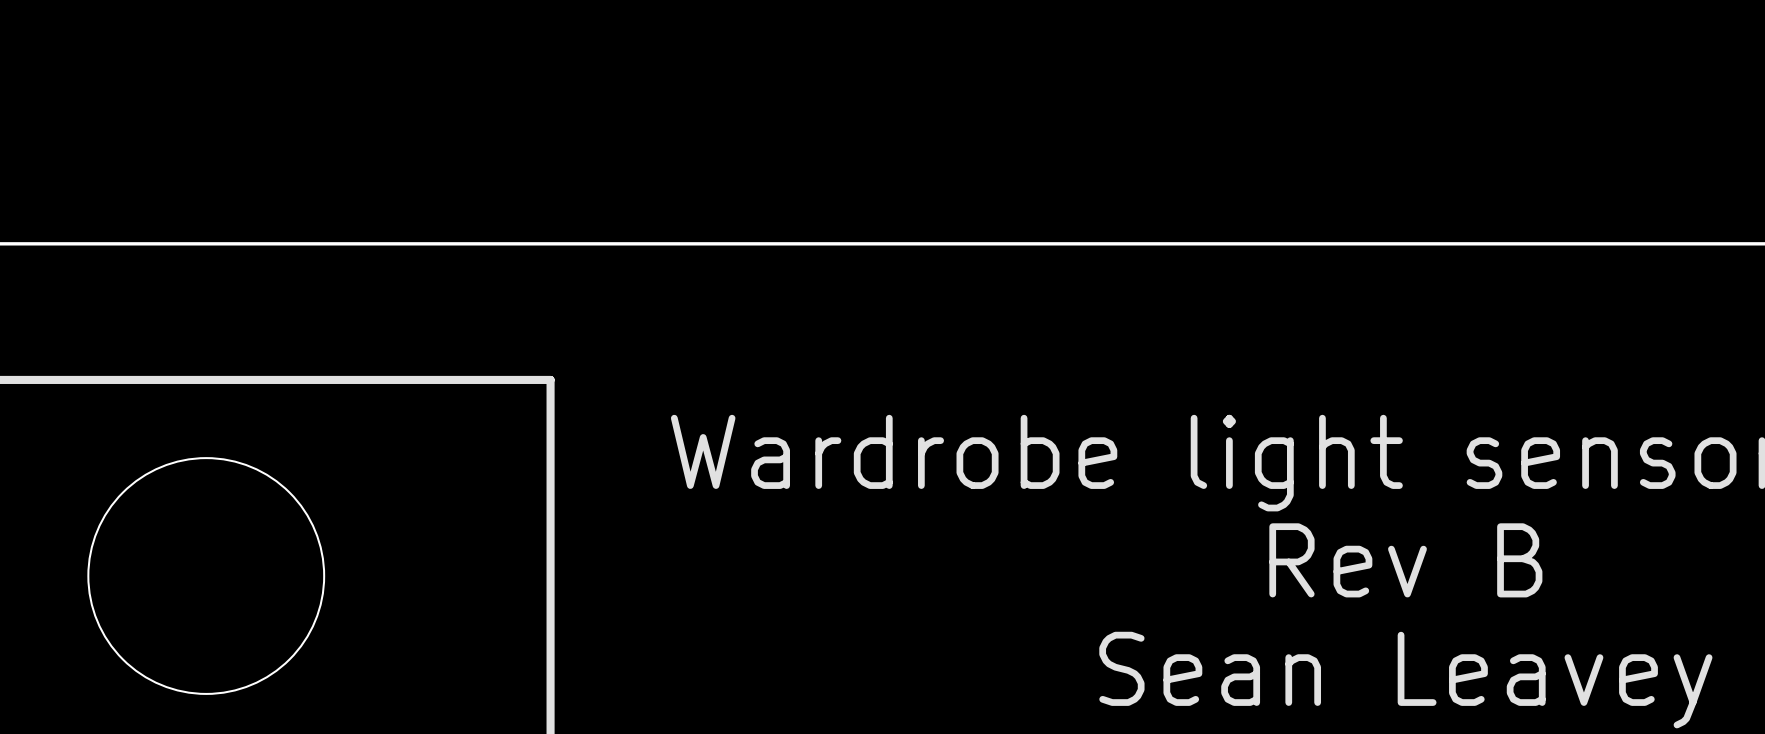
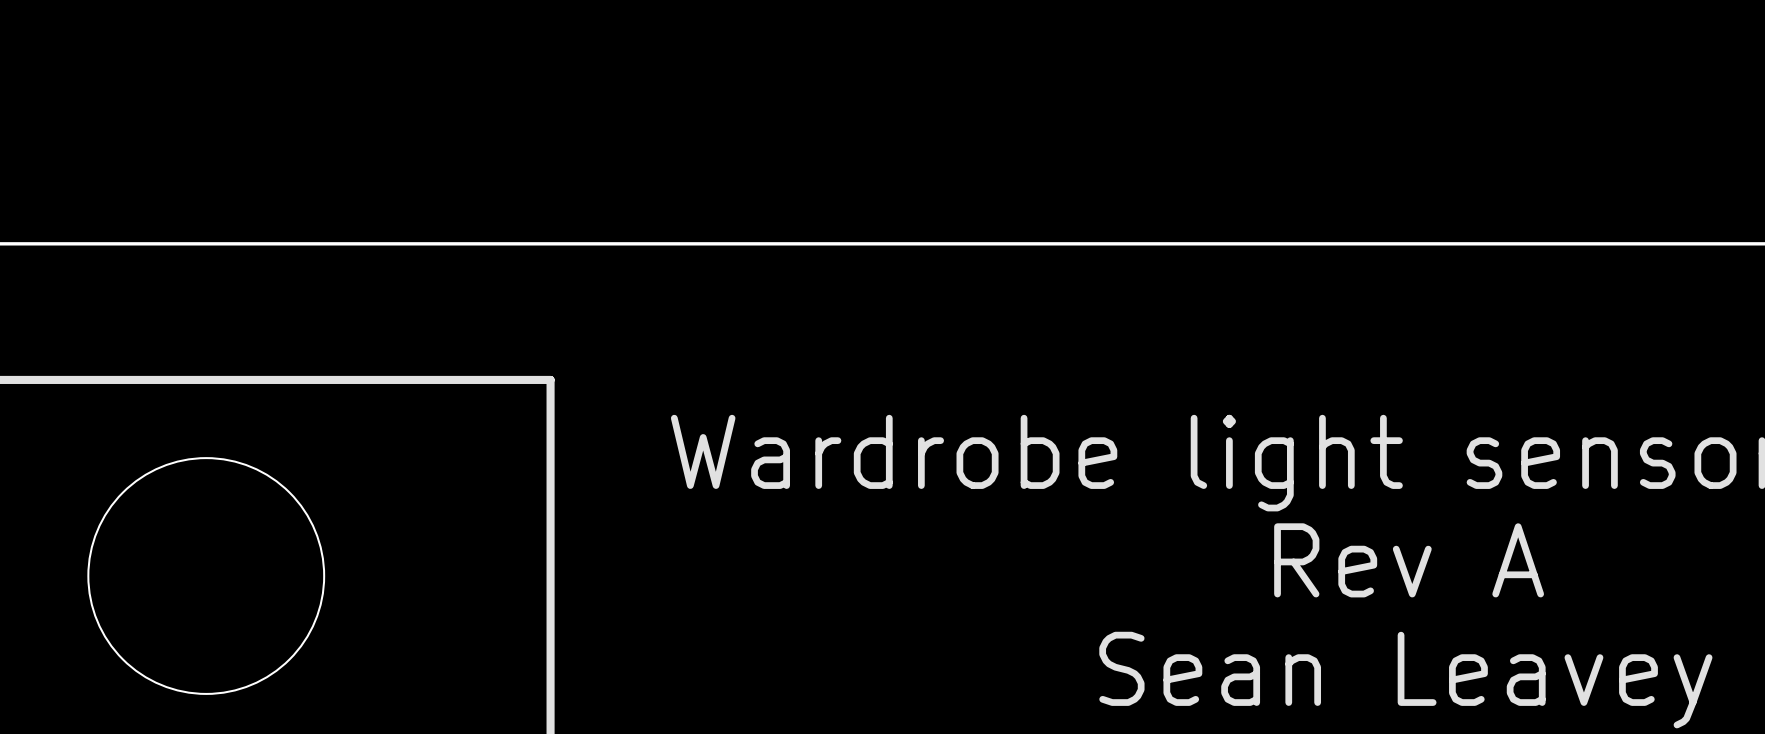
text: Rev B (1405, 560) -> Rev A (1409, 560)

